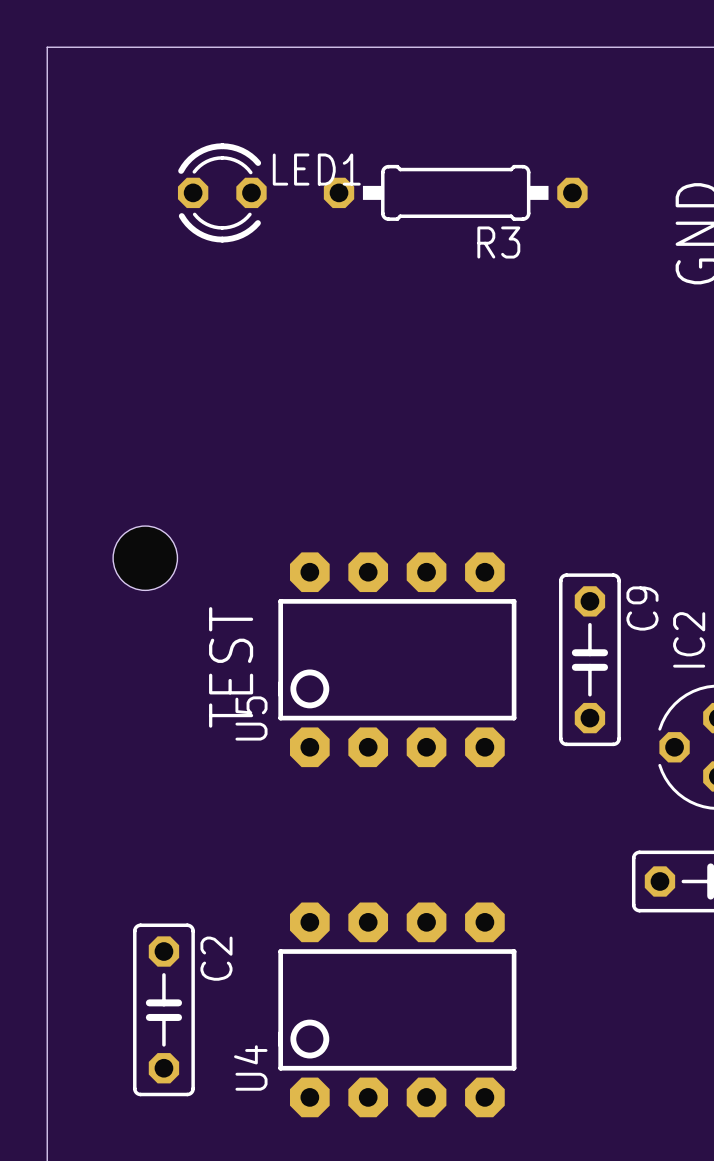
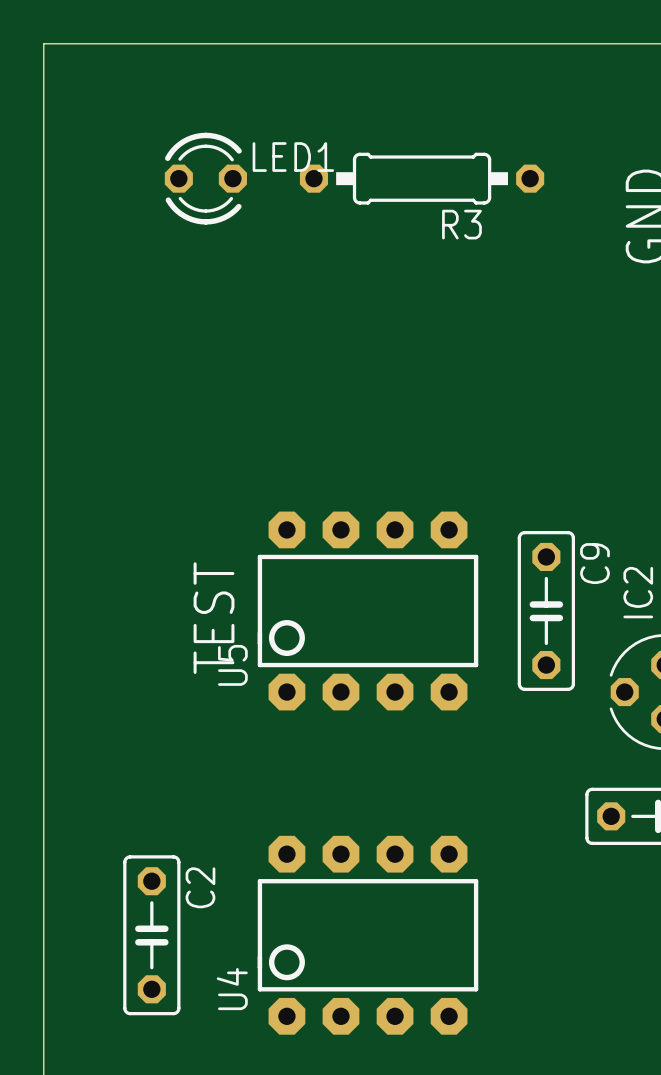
hole: (145, 558) -> none

